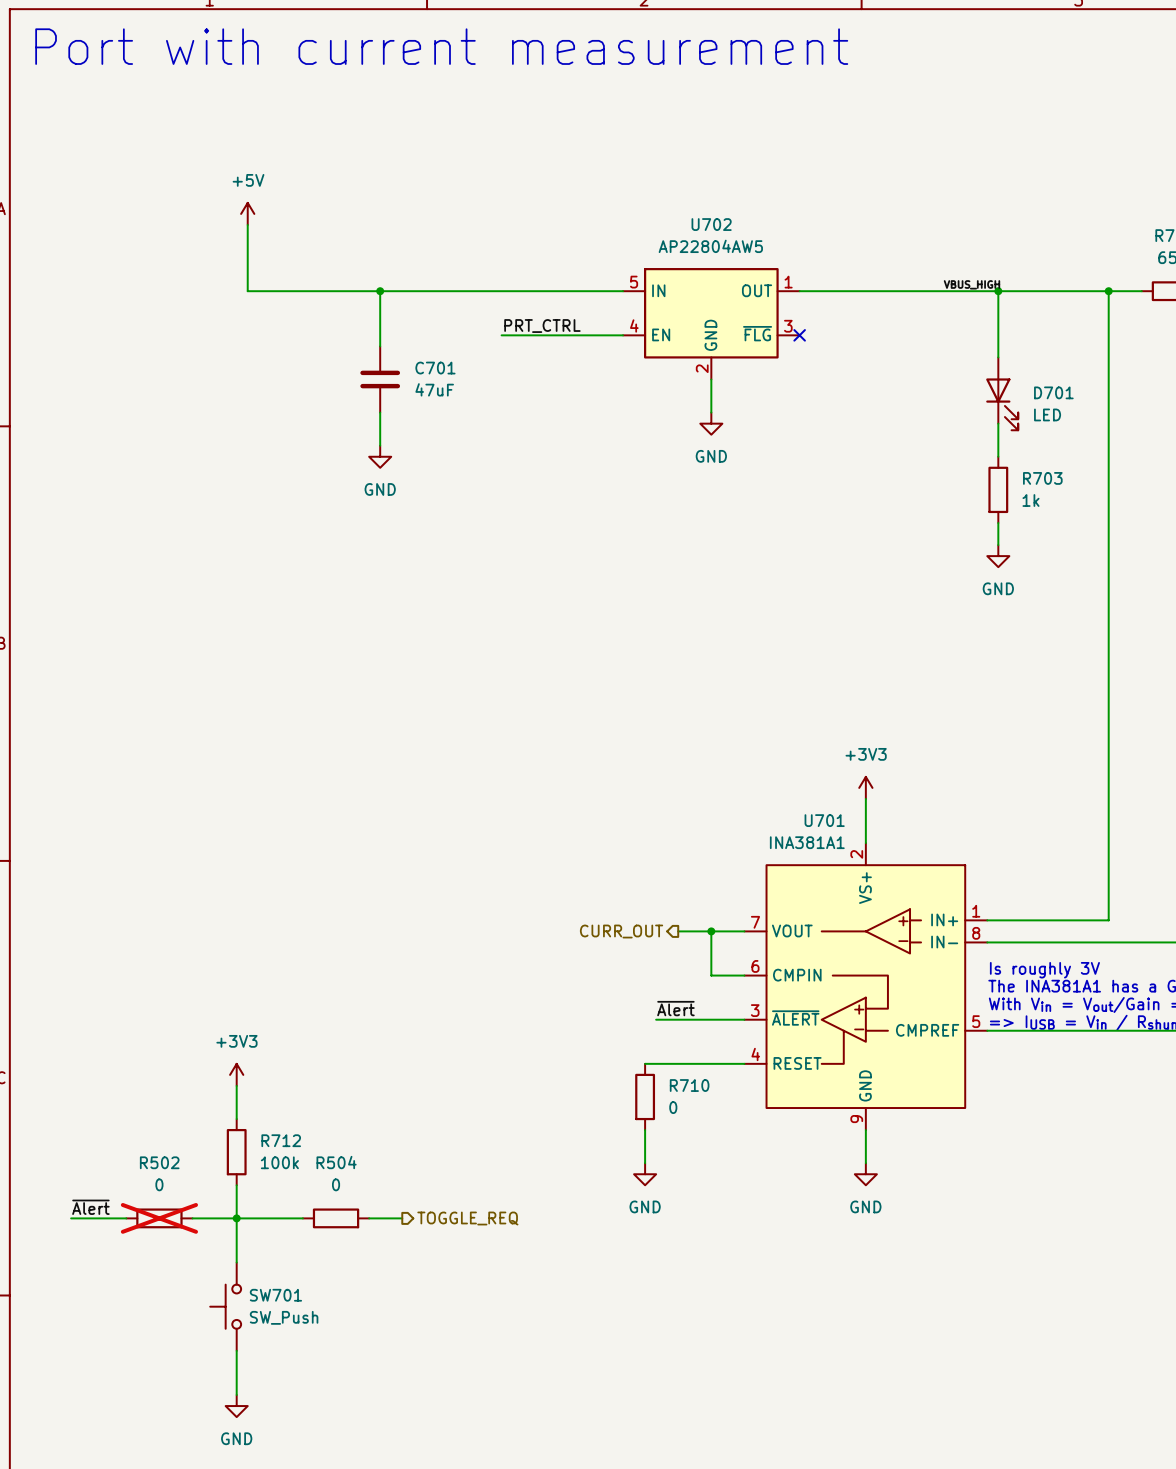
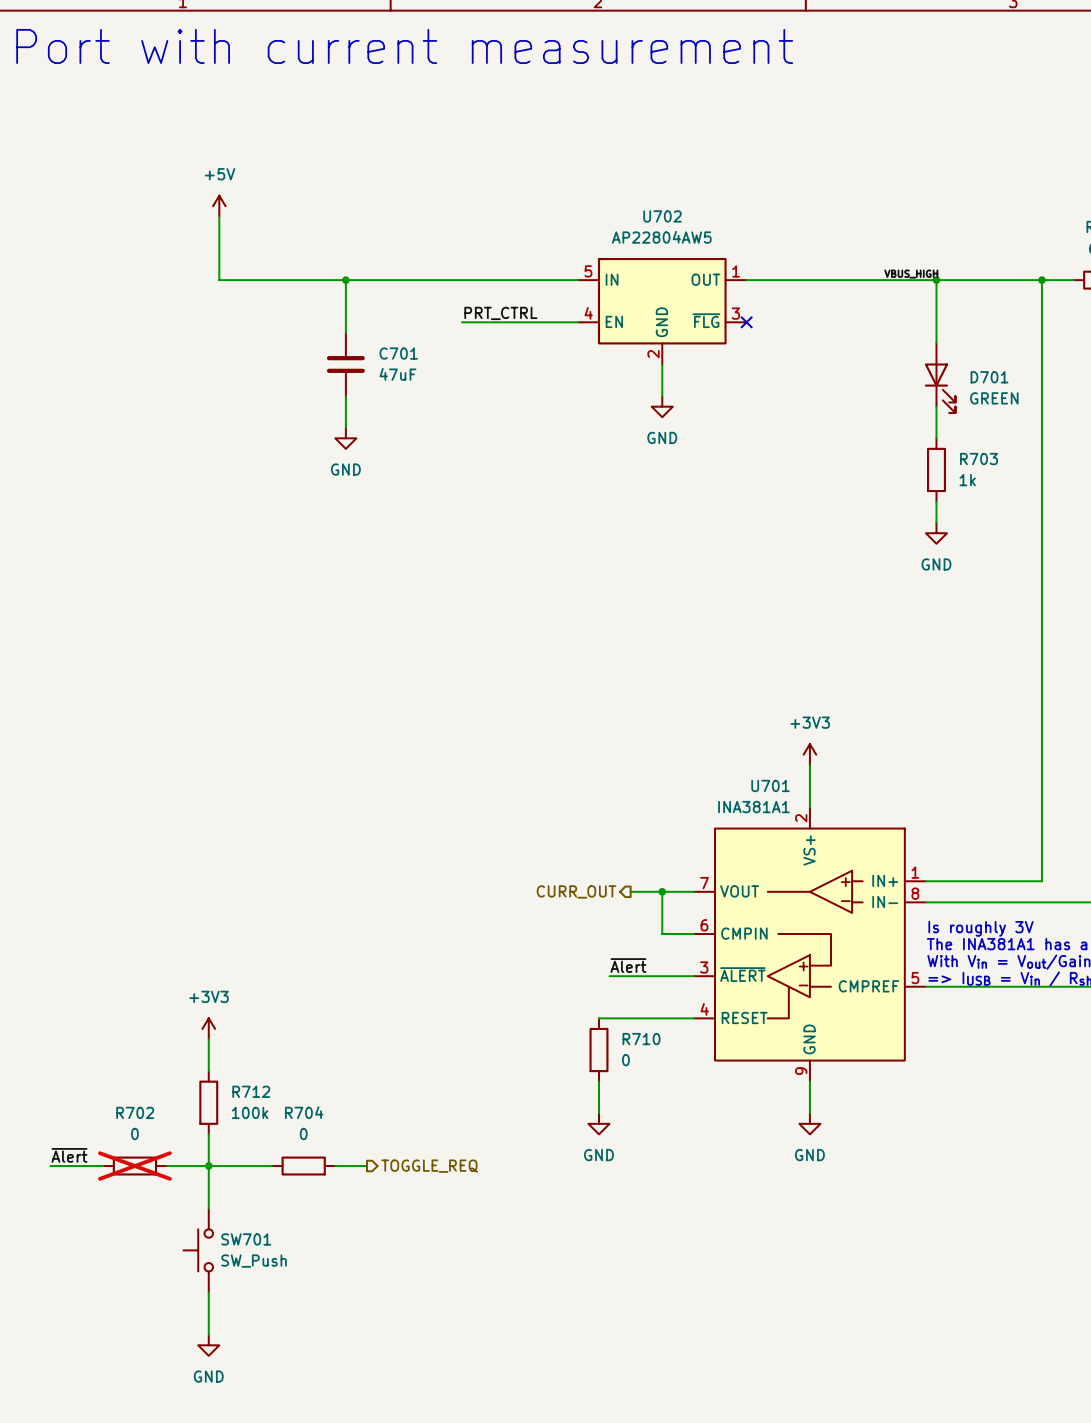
D701 value: LED (1047, 414) -> GREEN (994, 398)
R502 name: R502 (159, 1162) -> R702 (135, 1112)
R504 name: R504 (336, 1162) -> R704 (304, 1112)

